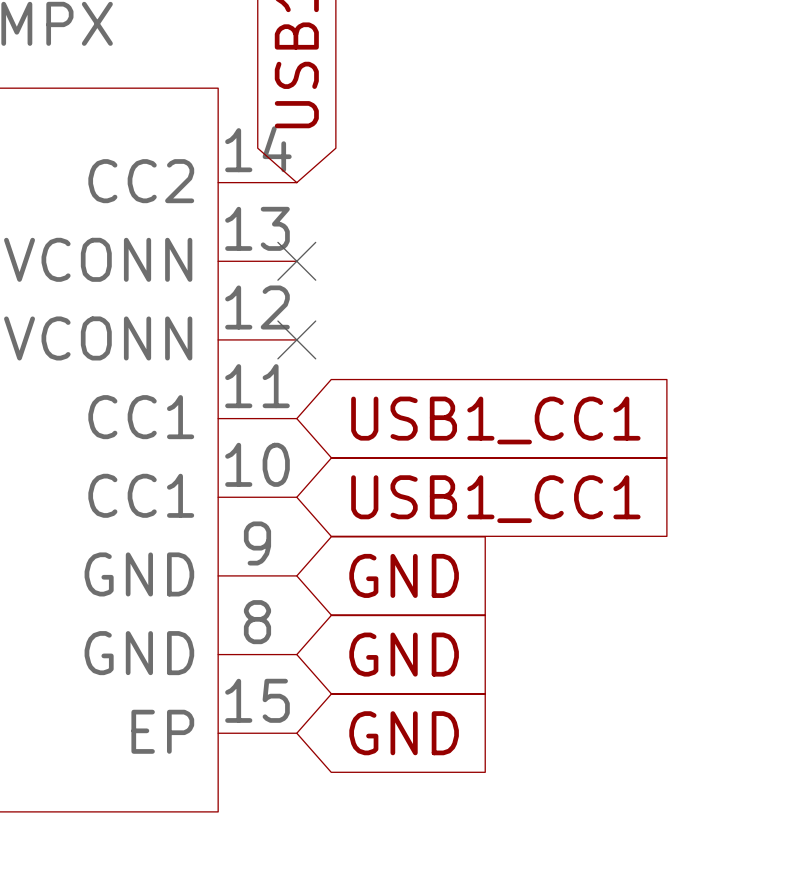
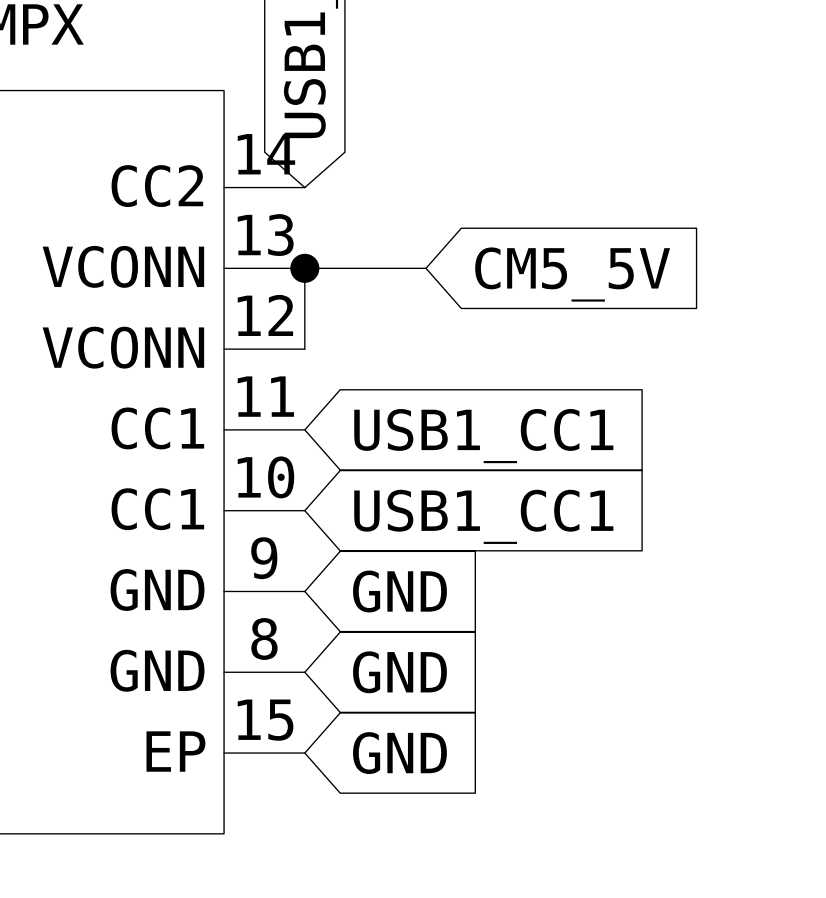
no-connect mark: (296, 261) -> none
junction: none -> (304, 268)
wire: none -> (426, 268) (304, 268) (304, 349)
global label: none -> CM5_5V (572, 274)
no-connect mark: (296, 339) -> none

